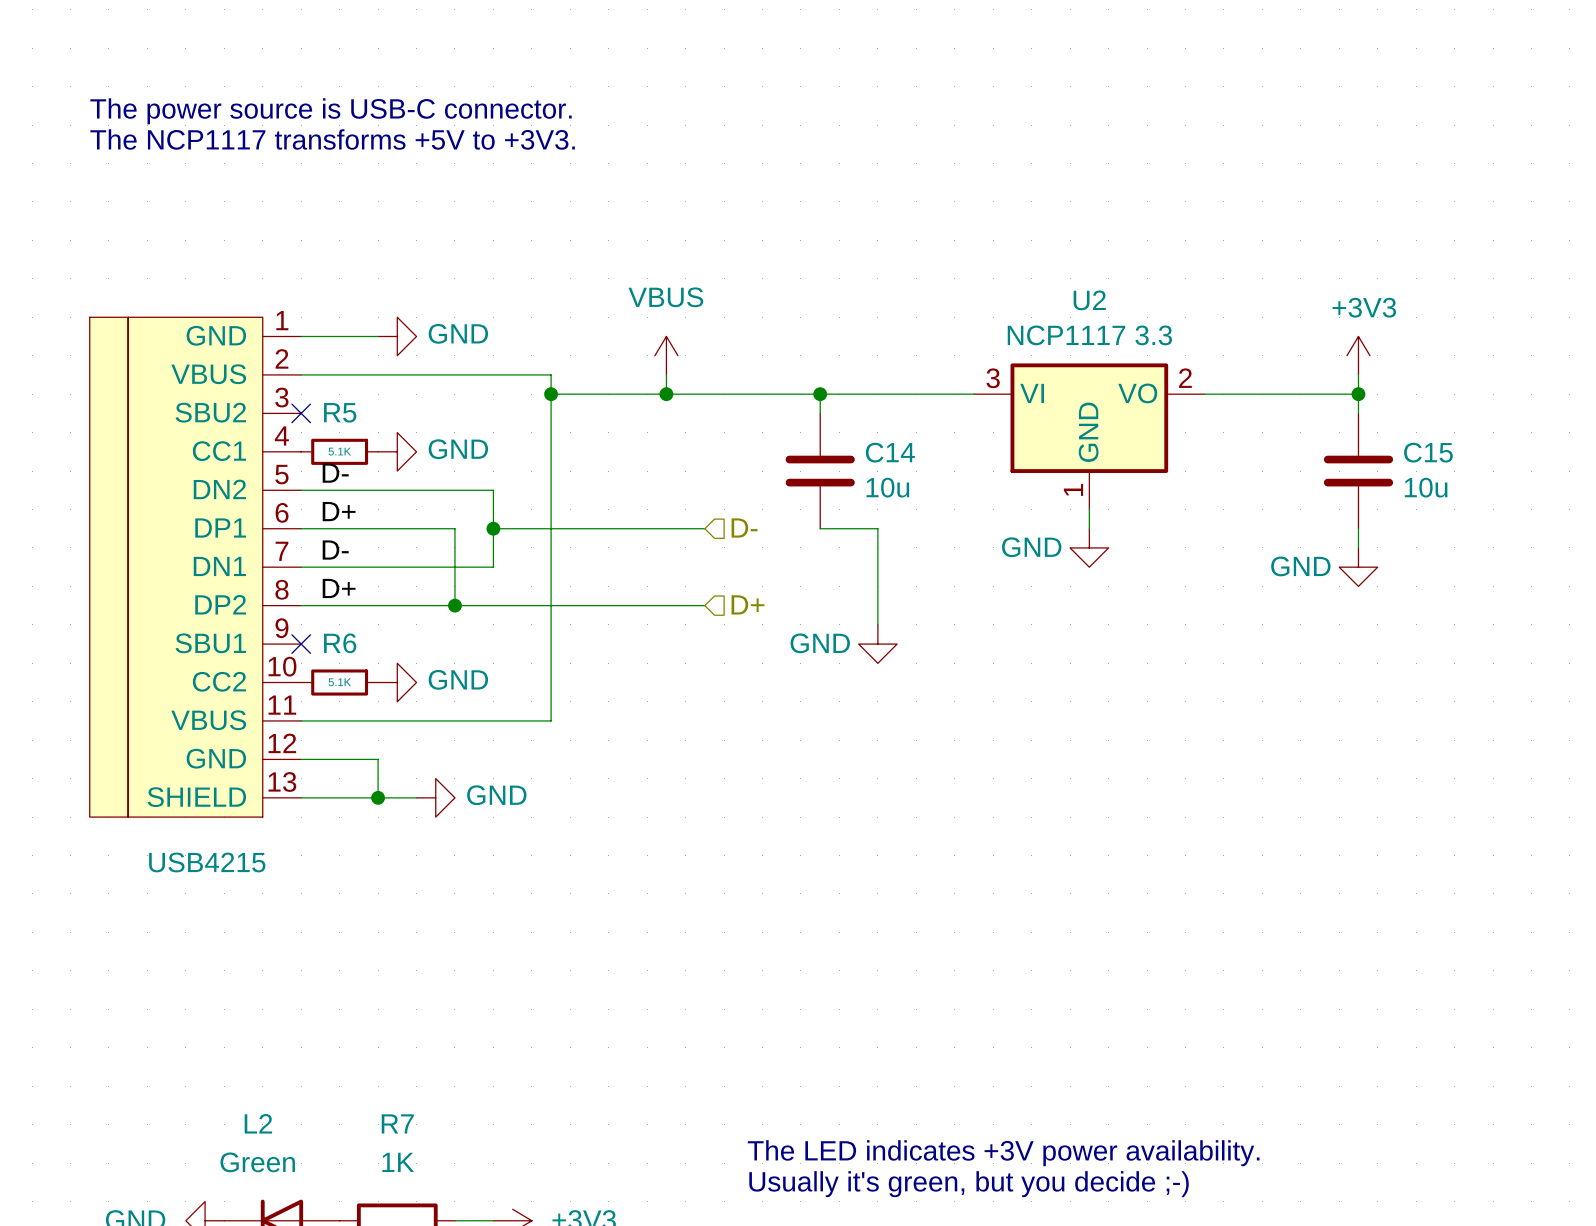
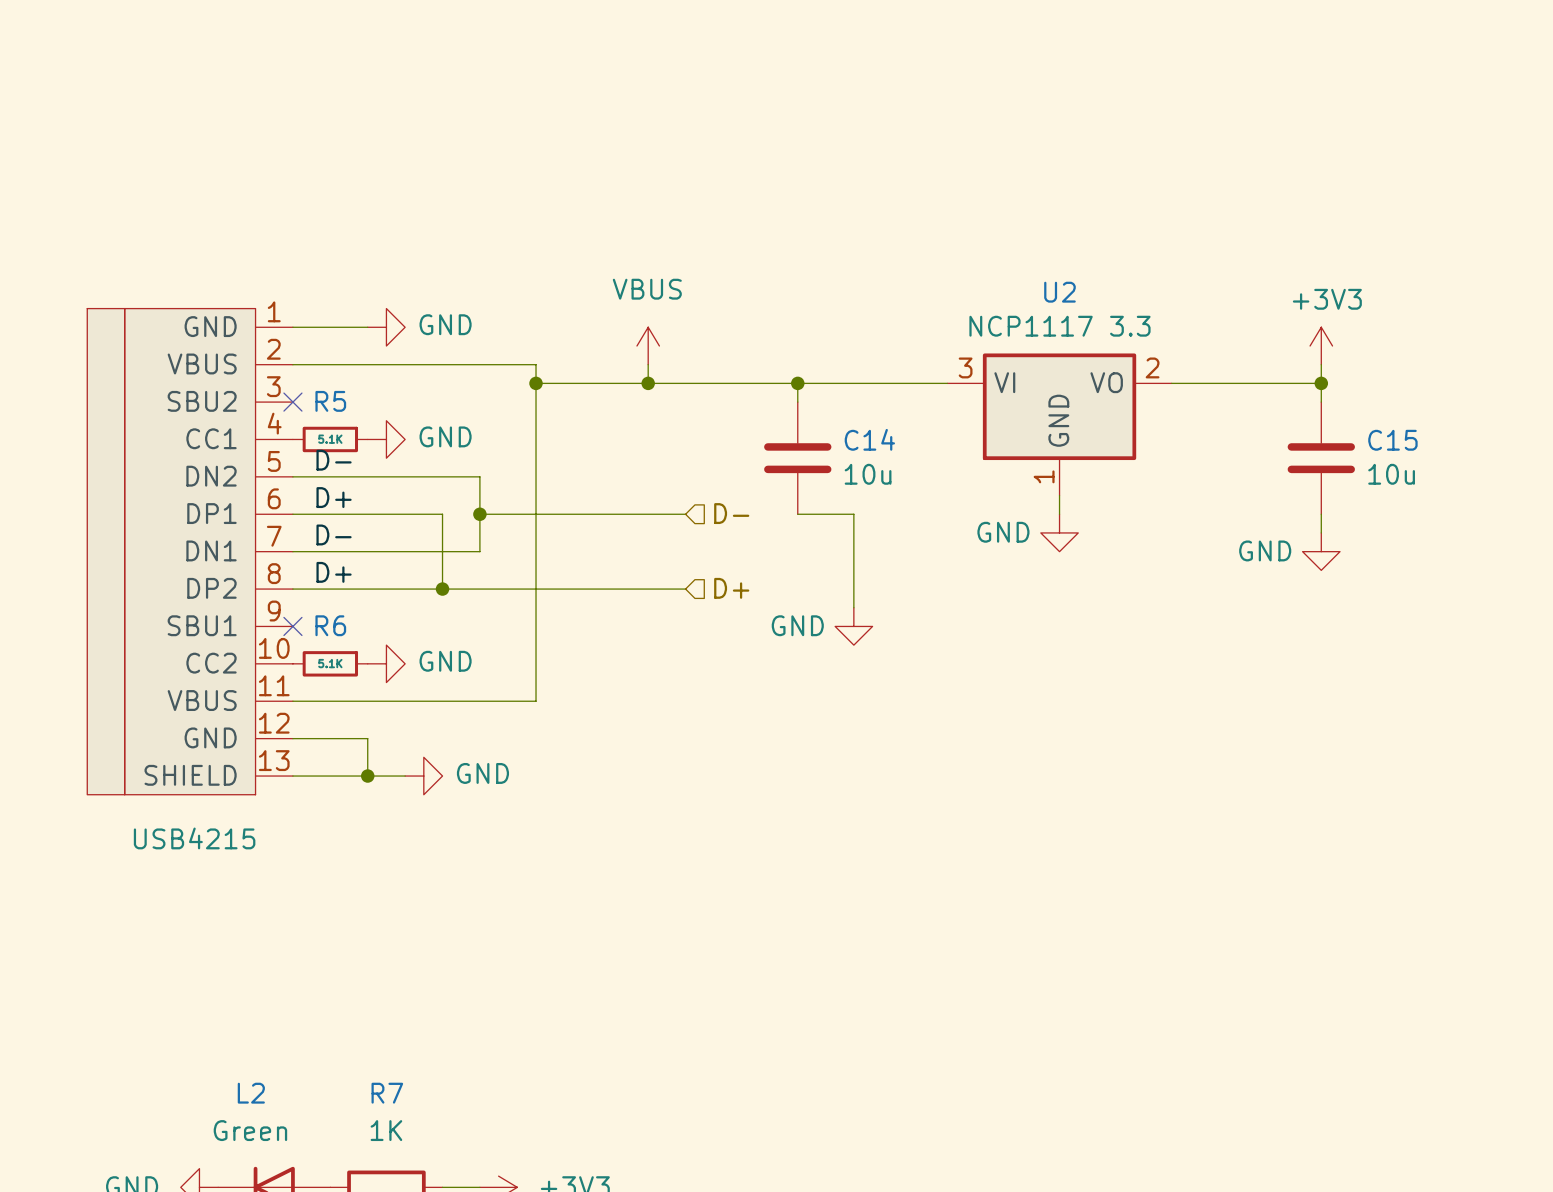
text: The power source is USB-C connector. (331, 111) -> none
text: The NCP1117 transforms +5V to +3V3. (332, 139) -> none
text: The LED indicates +3V power availability. (1003, 1153) -> none
text: Usually it's green, but you decide ;-) (969, 1184) -> none

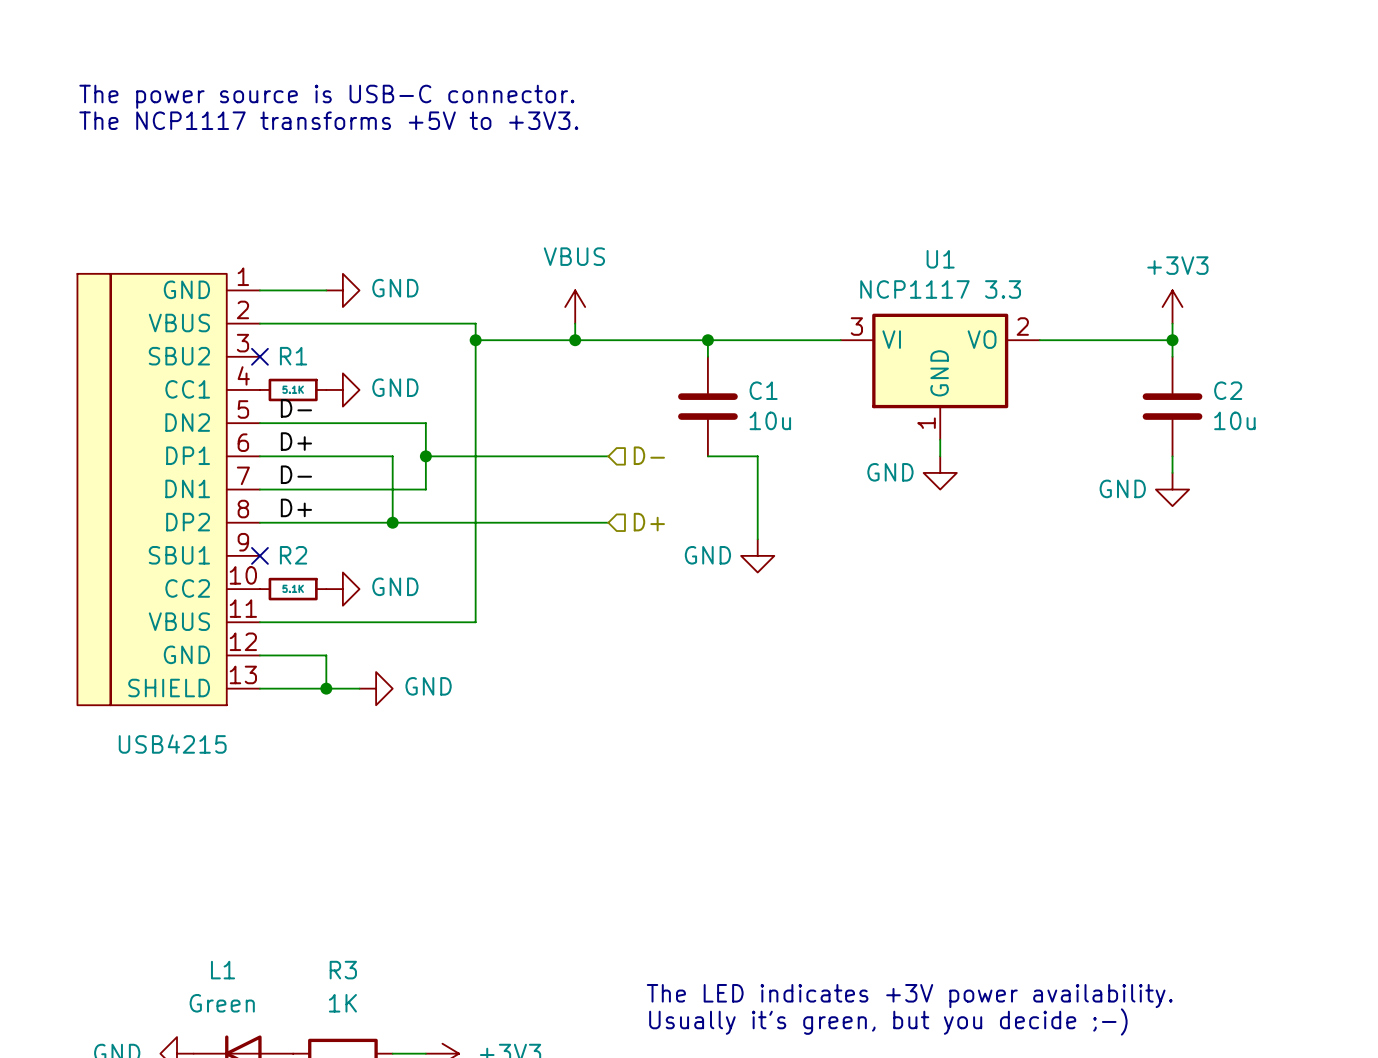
text: none -> The power source is USB-C connector. (326, 96)
text: none -> The NCP1117 transforms +5V to +3V3. (328, 120)
U2 name: U2 (1059, 292) -> U1 (940, 259)
R5 name: R5 (330, 401) -> R1 (293, 356)
C14 name: C14 (869, 439) -> C1 (763, 390)
C15 name: C15 (1392, 440) -> C2 (1228, 390)
R6 name: R6 (330, 625) -> R2 (293, 555)
L2 name: L2 (251, 1093) -> L1 (223, 970)
R7 name: R7 (387, 1093) -> R3 (343, 970)
text: none -> The LED indicates +3V power availability. (909, 996)
text: none -> Usually it's green, but you decide ;-) (888, 1021)

